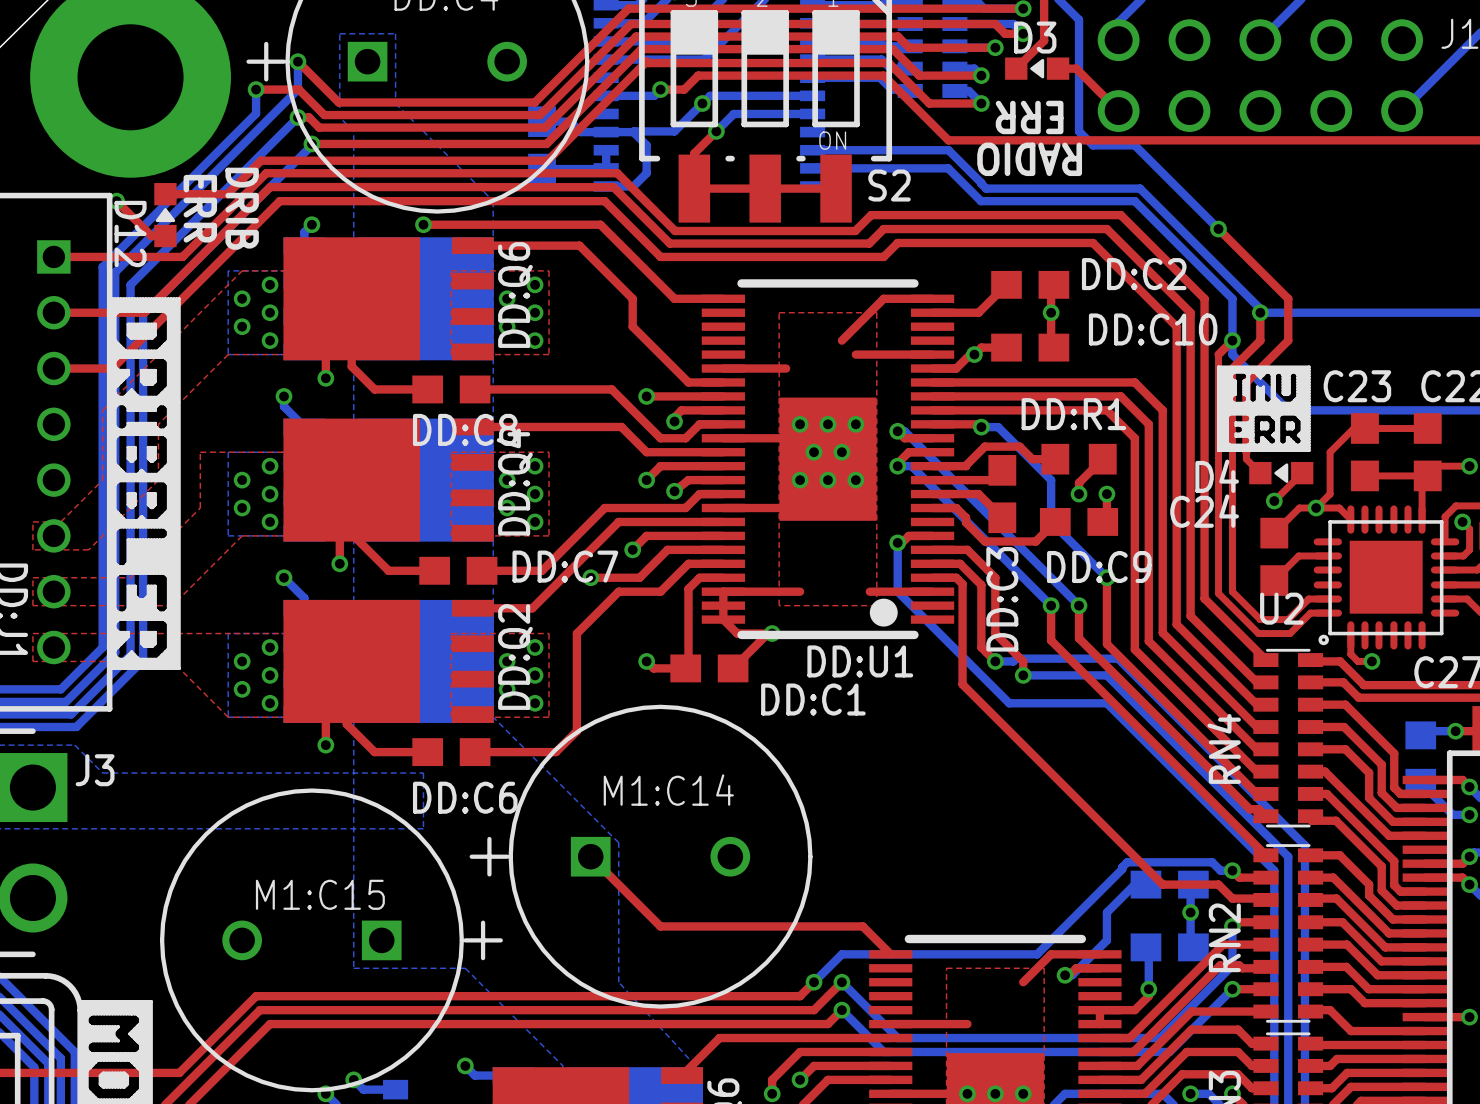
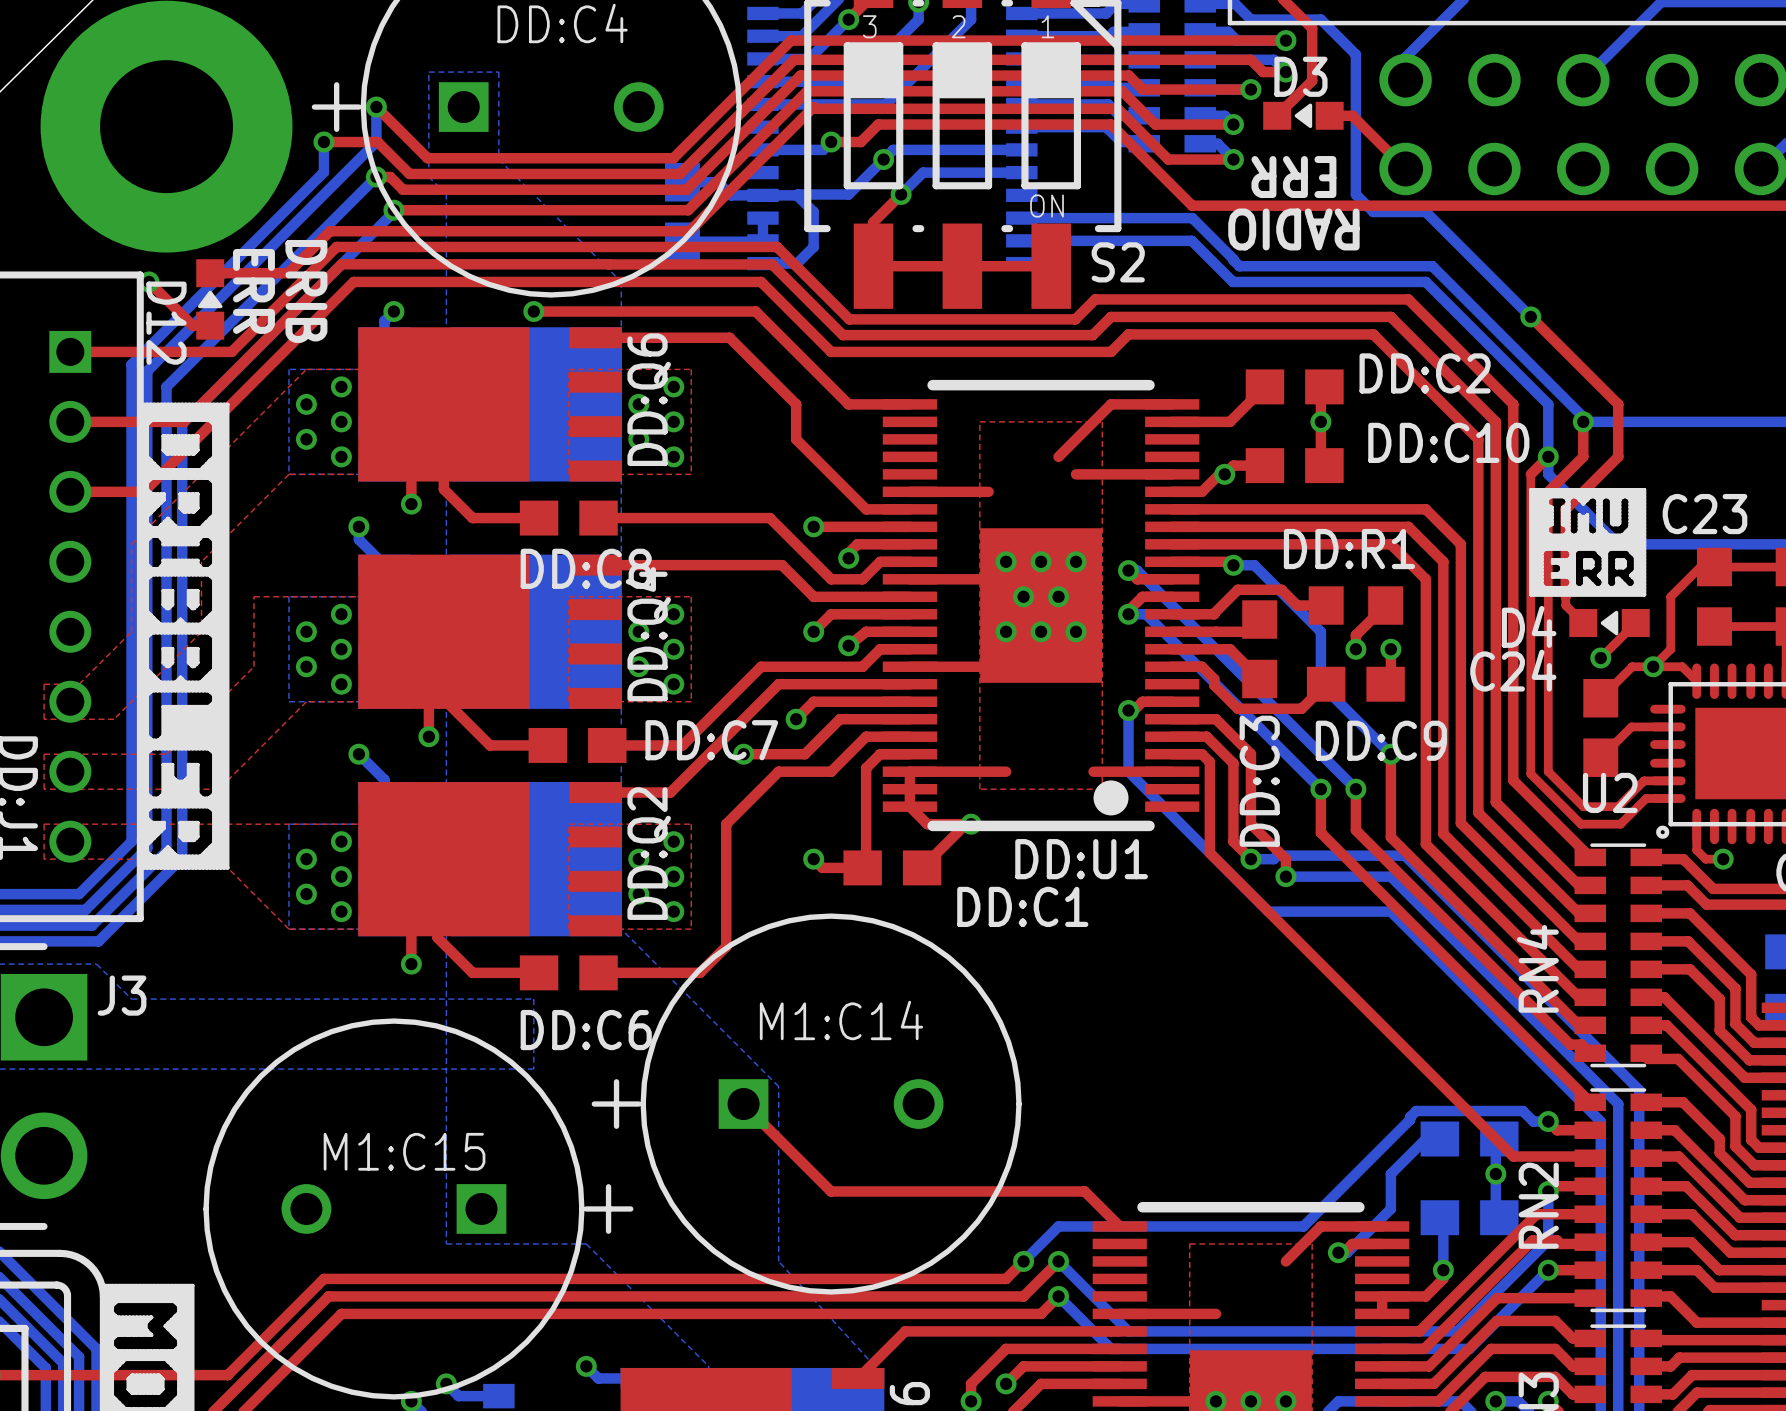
top track: (962, 656) (962, 684) (1162, 884) (1218, 884) (1232, 898) -> (1209, 853) (1513, 1156) (1548, 1156)

